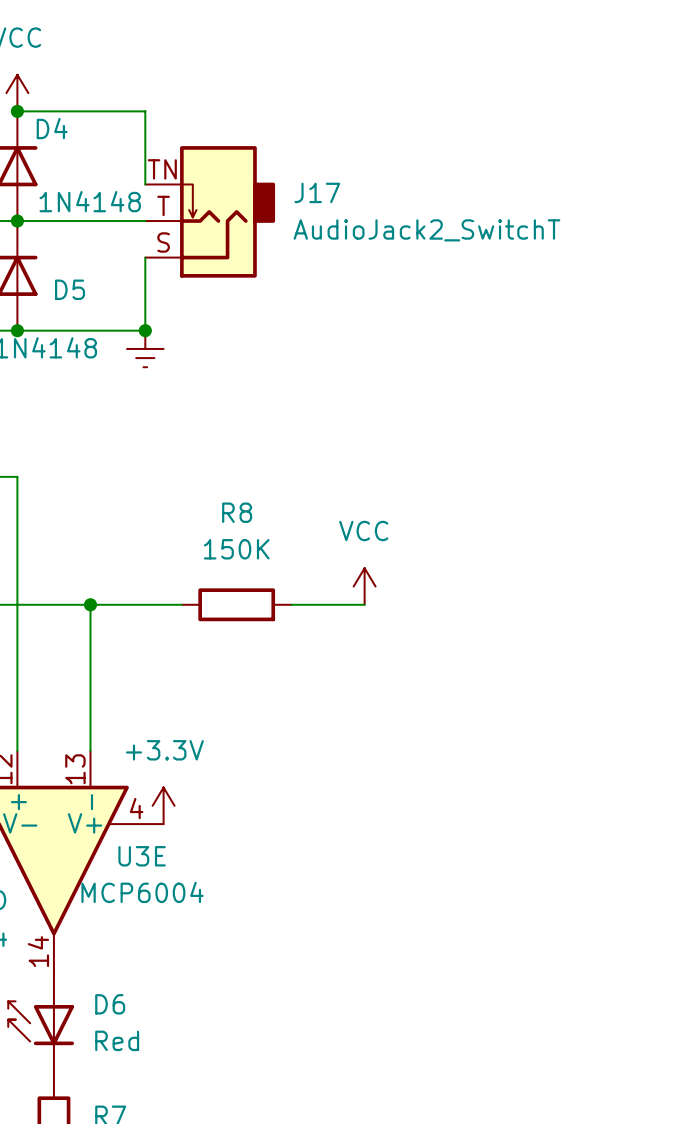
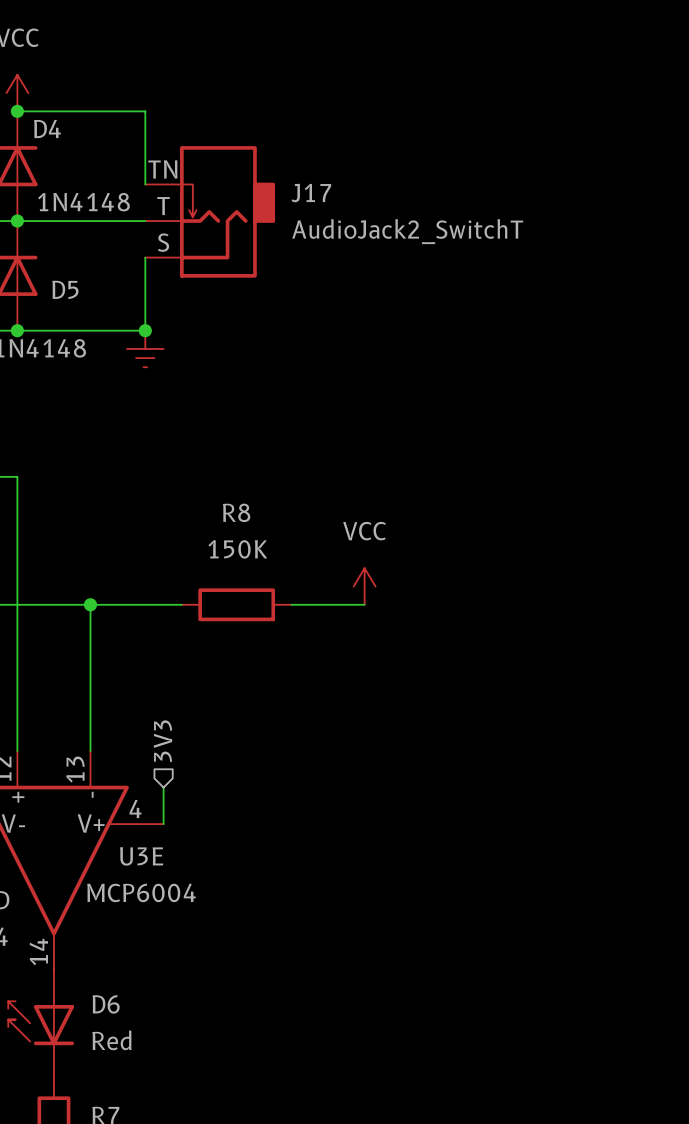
hierarchical label: none -> 3V3 (163, 741)
power symbol: +3.3V (163, 805) -> none

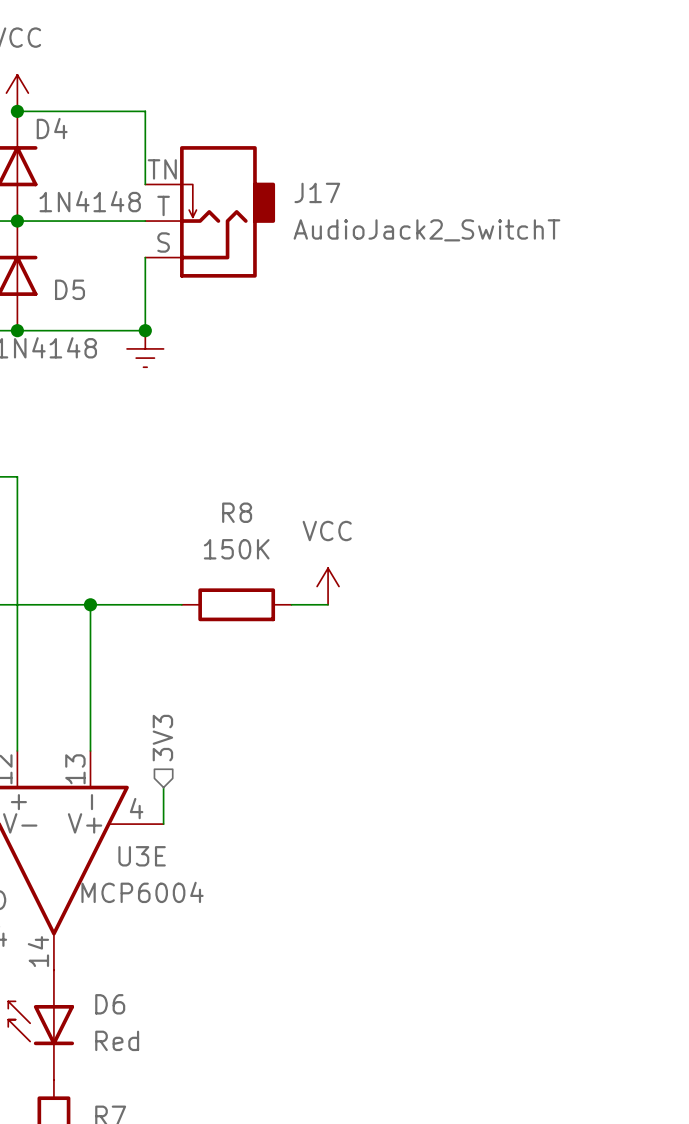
power symbol position: VCC (364, 586) -> VCC (328, 586)
wire: (328, 604) (364, 604) -> none

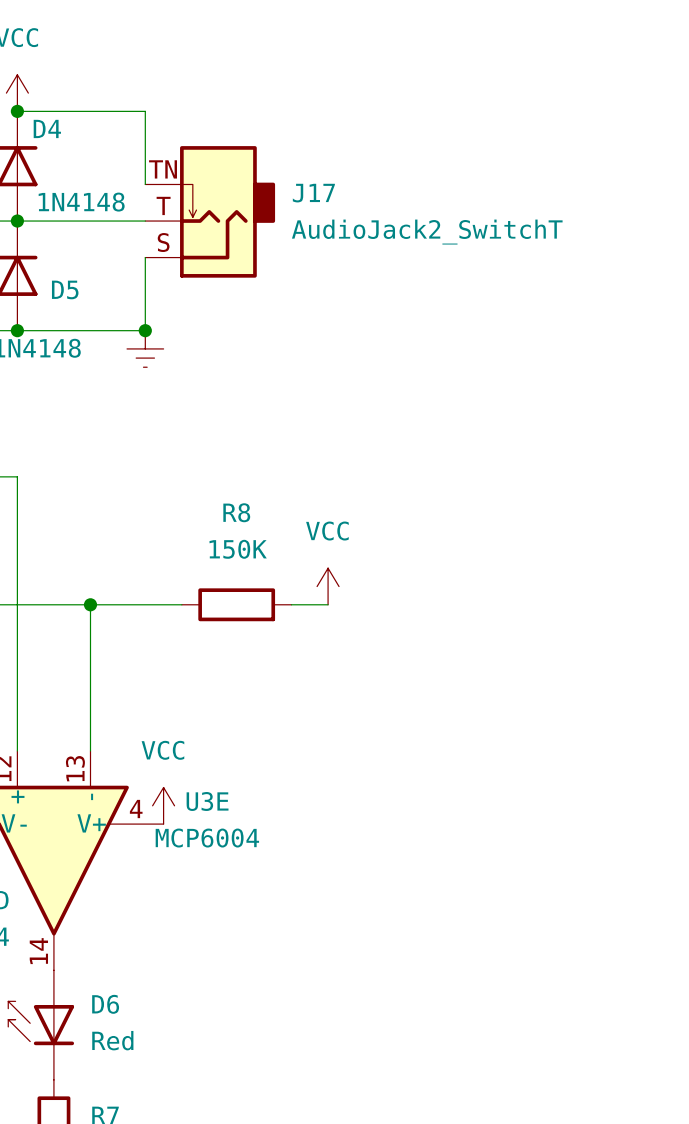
hierarchical label: 3V3 (162, 738) -> none
power symbol: none -> VCC (163, 805)
U3E name position: U3E (142, 856) -> U3E (207, 801)
U3E value position: MCP6004 (142, 892) -> MCP6004 (207, 838)

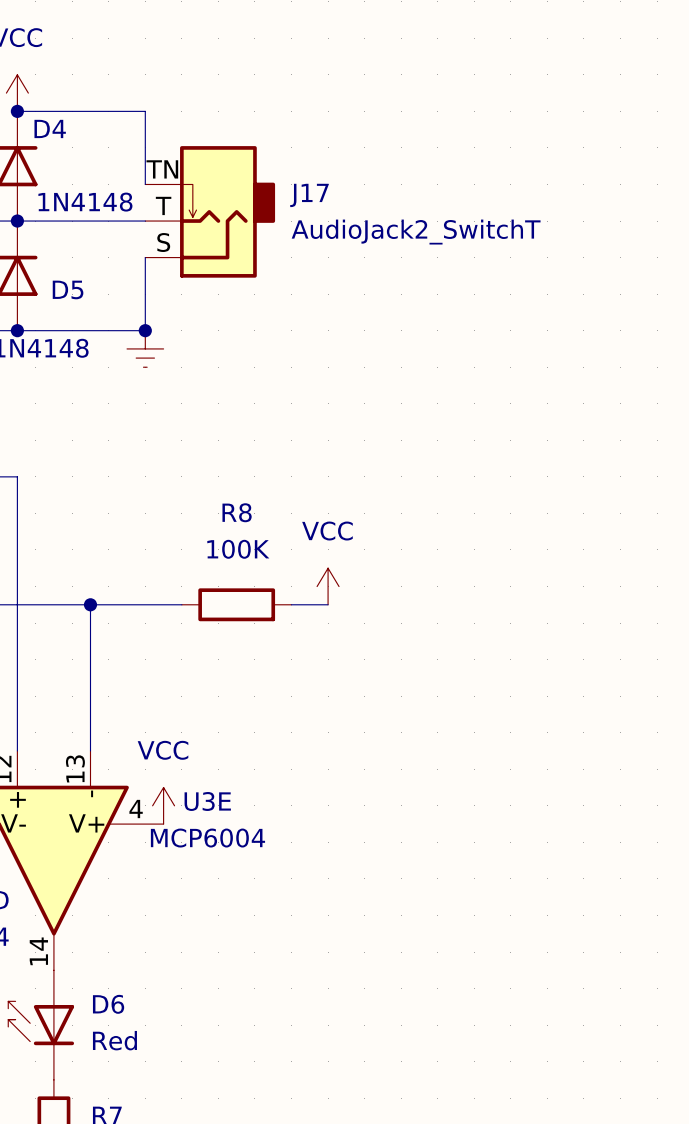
R8 value: 150K (238, 549) -> 100K (238, 549)

